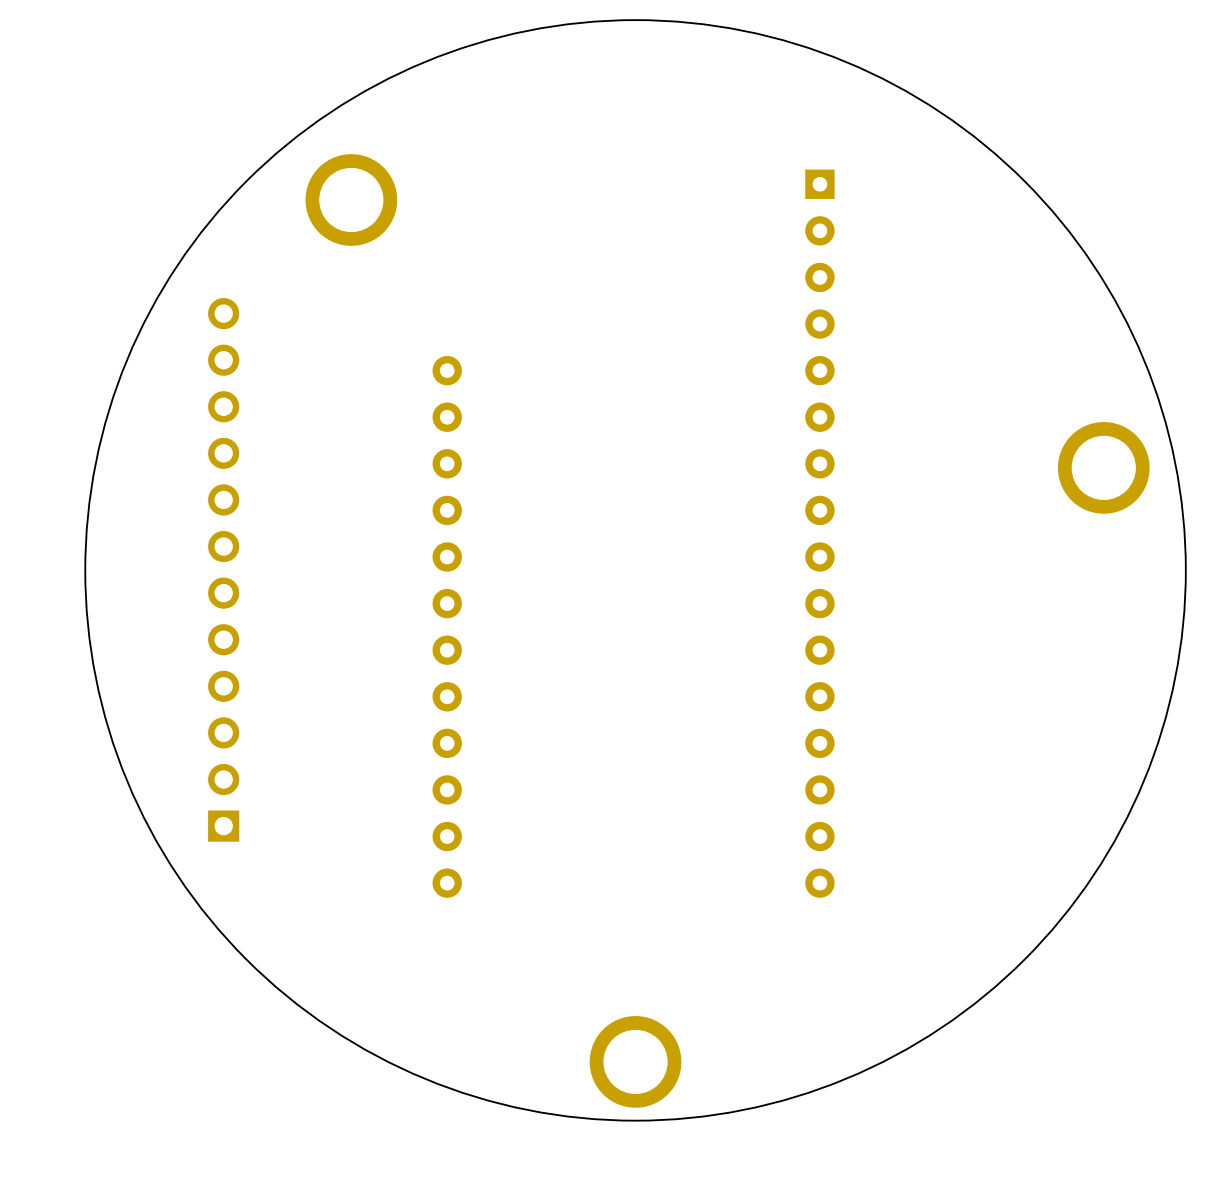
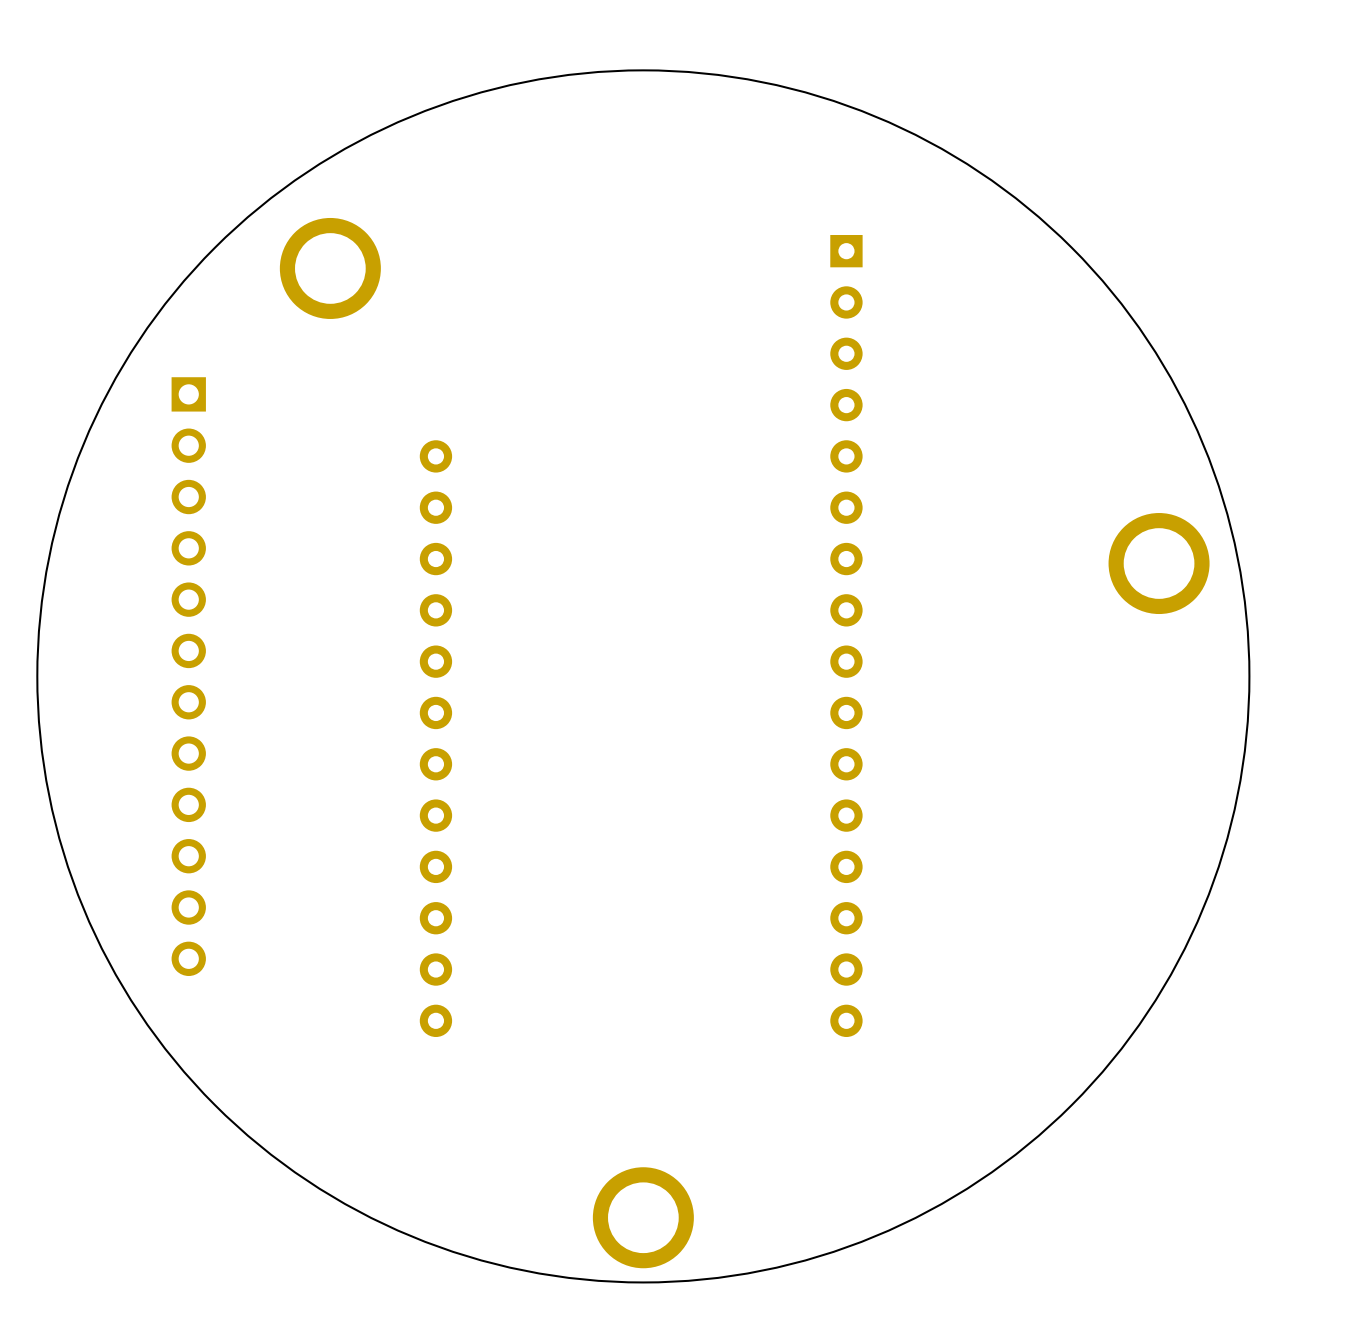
part rotation: 0° (223, 569) -> 180° (188, 676)

